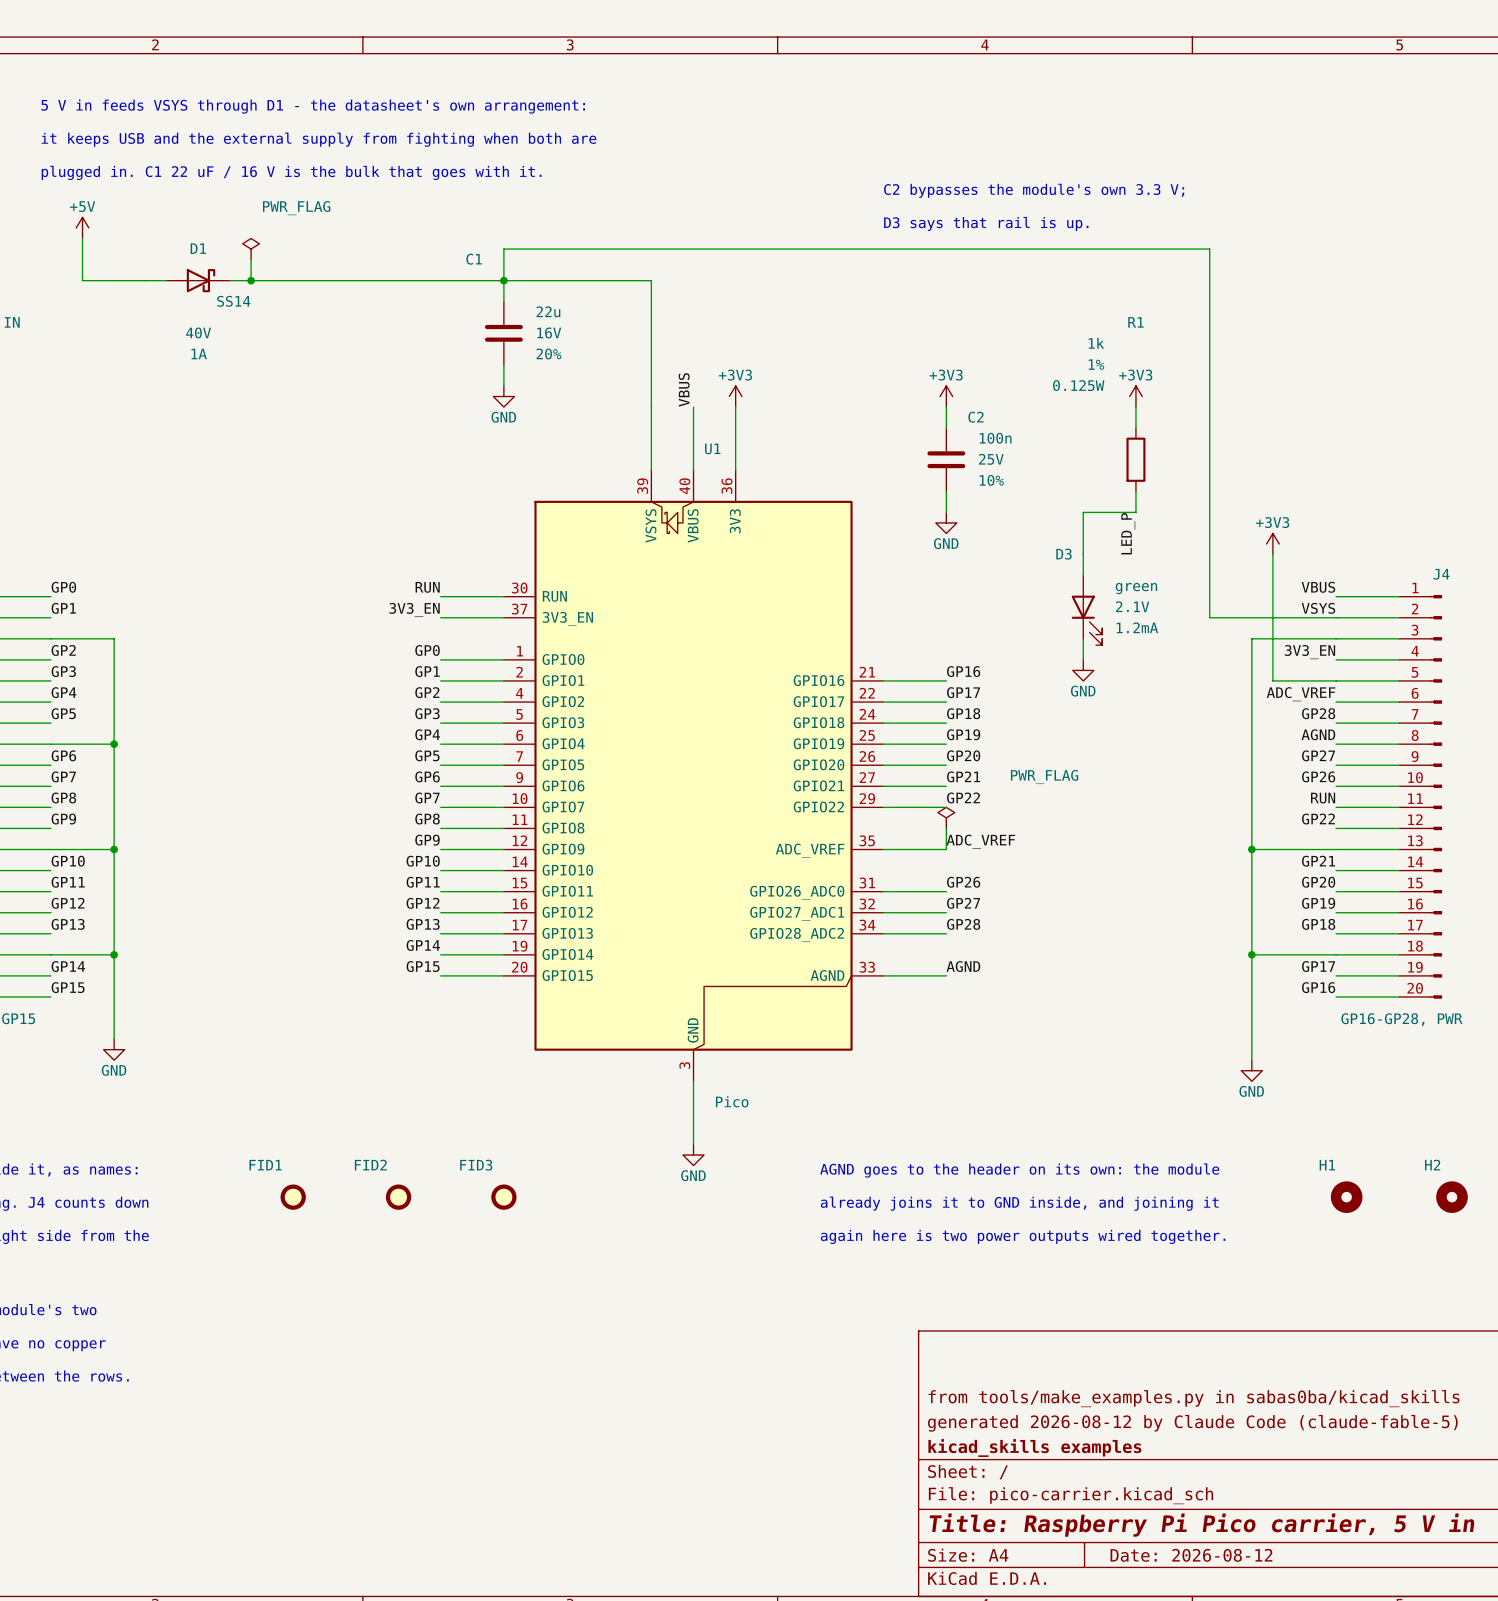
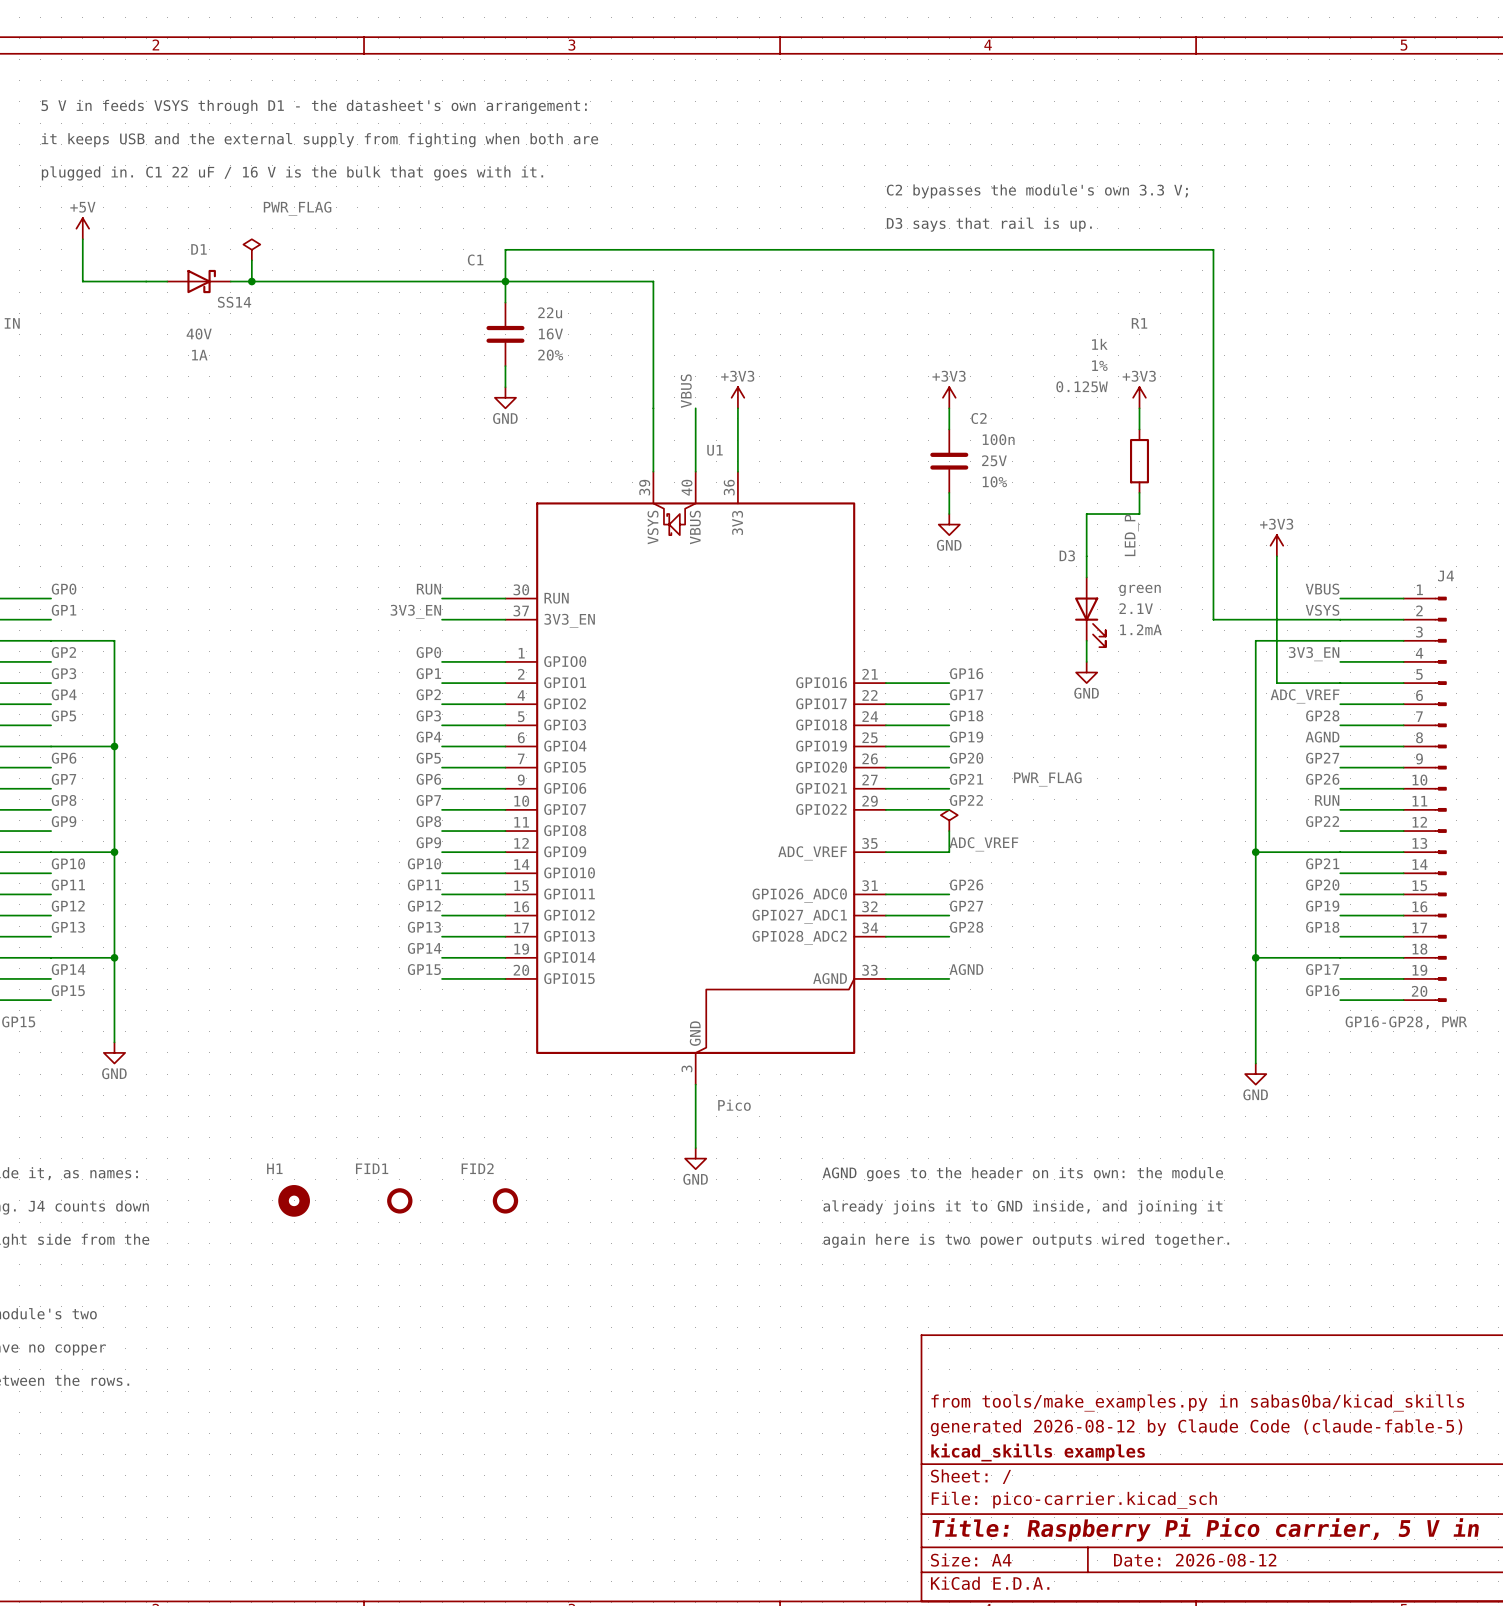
FID2 name: FID2 (370, 1165) -> FID1 (372, 1168)
FID3 name: FID3 (476, 1165) -> FID2 (477, 1168)
FID1: (293, 1197) -> none
H1 position: (1346, 1197) -> (294, 1200)
H2: (1451, 1197) -> none

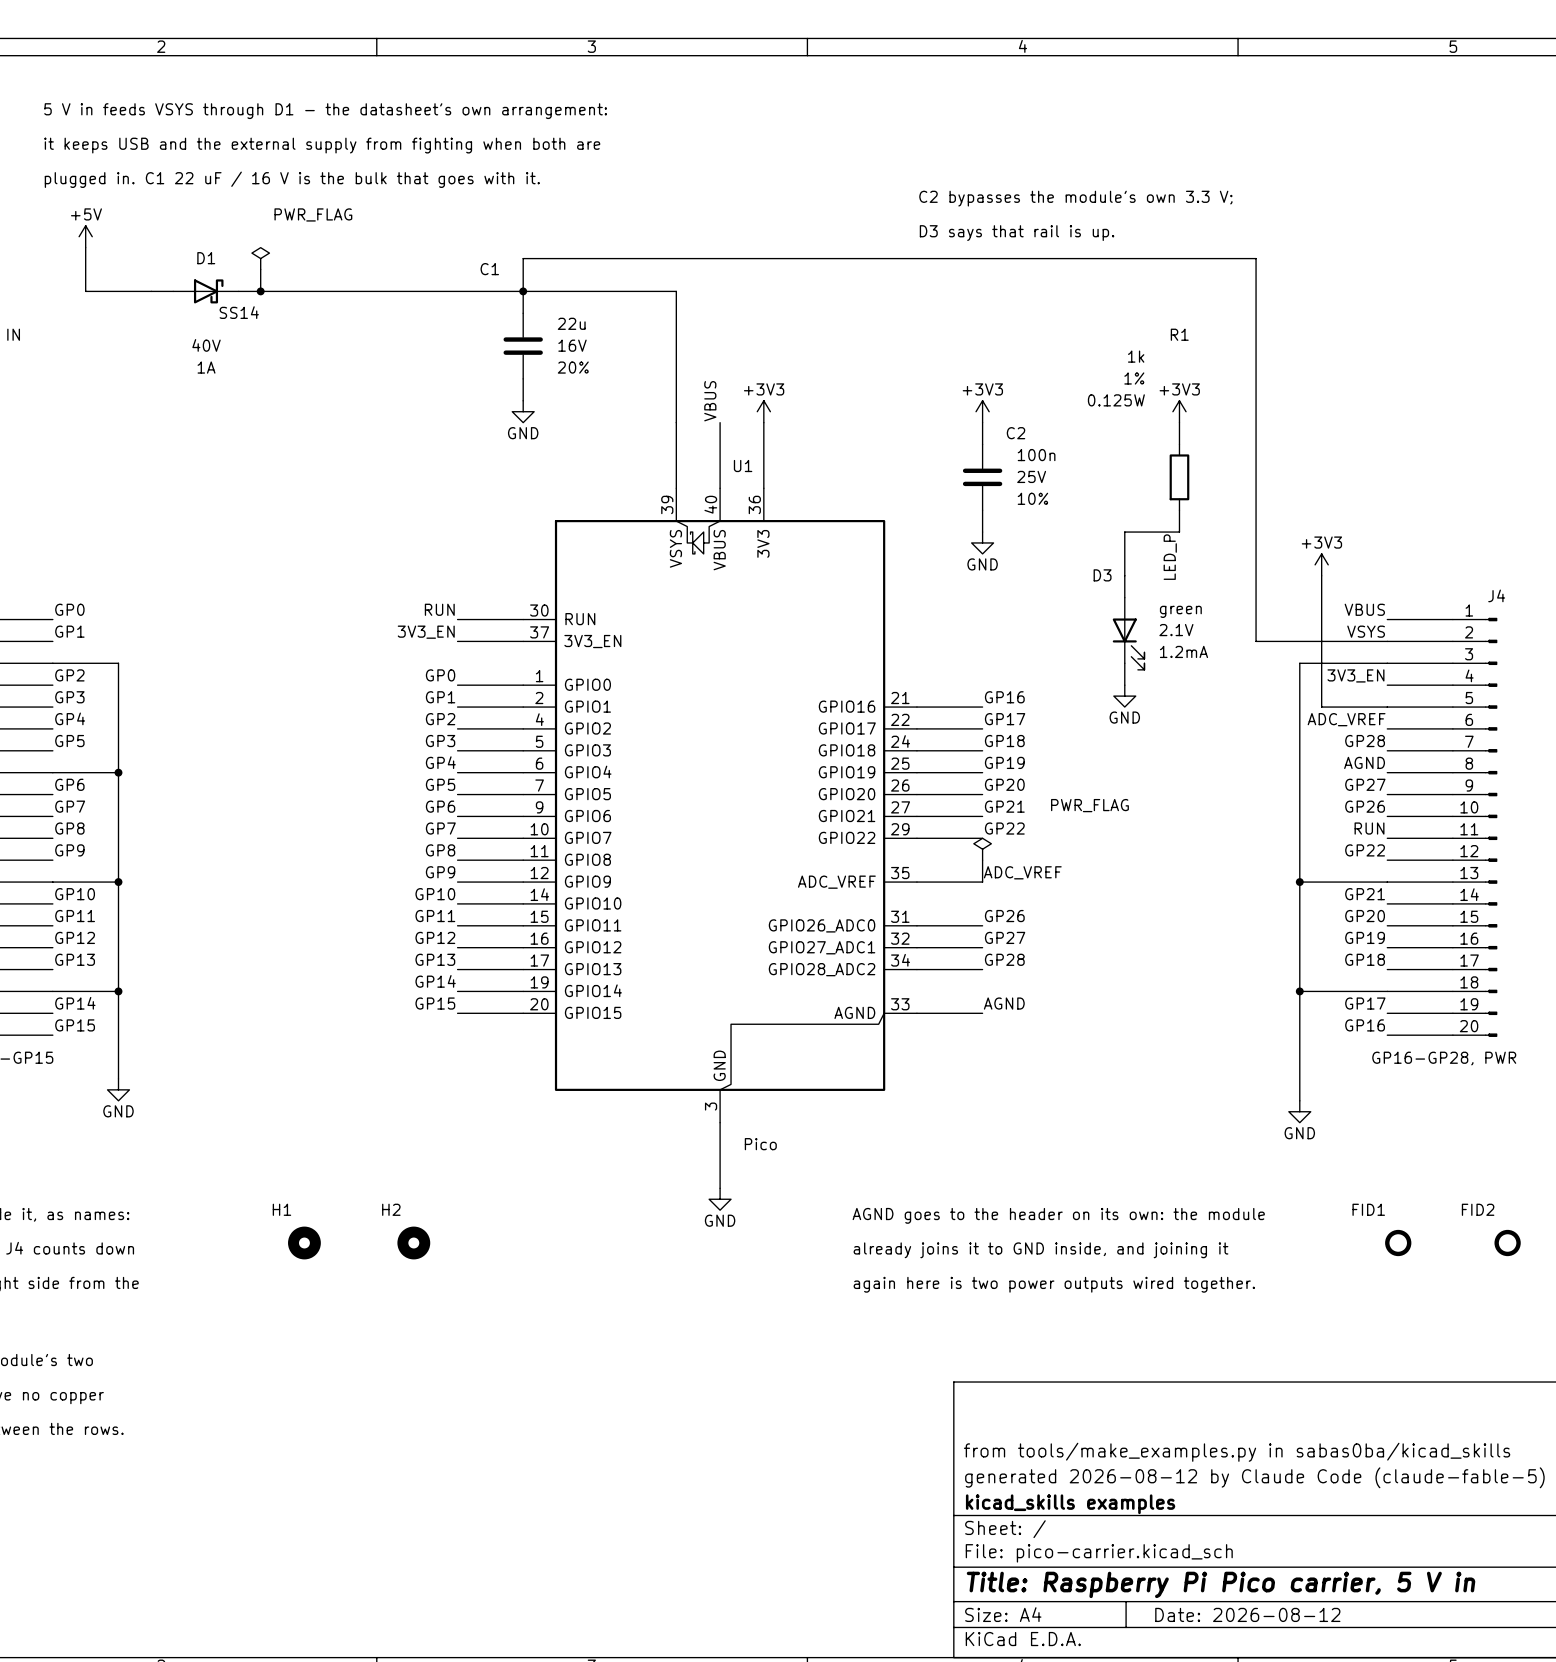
FID1 position: (399, 1200) -> (1398, 1243)
H2: none -> (413, 1243)
FID2 position: (505, 1200) -> (1507, 1243)

